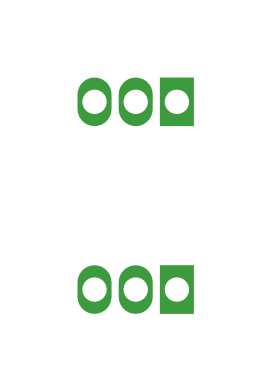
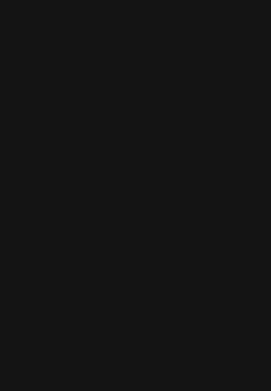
part: (135, 101) -> none
part: (135, 289) -> none

